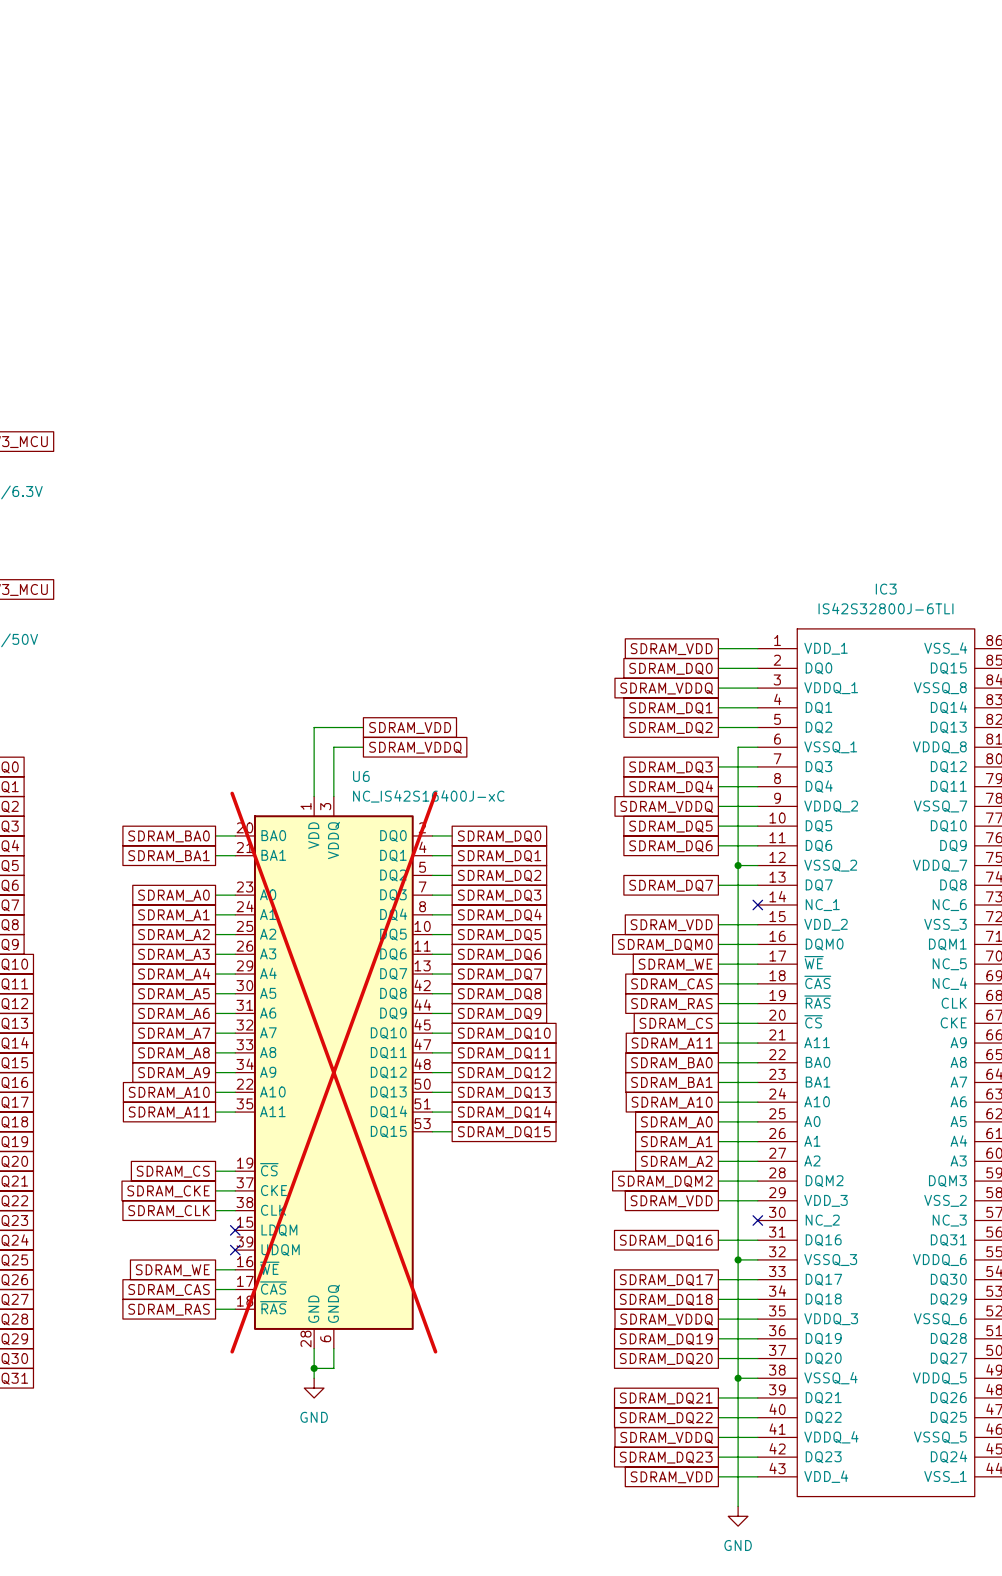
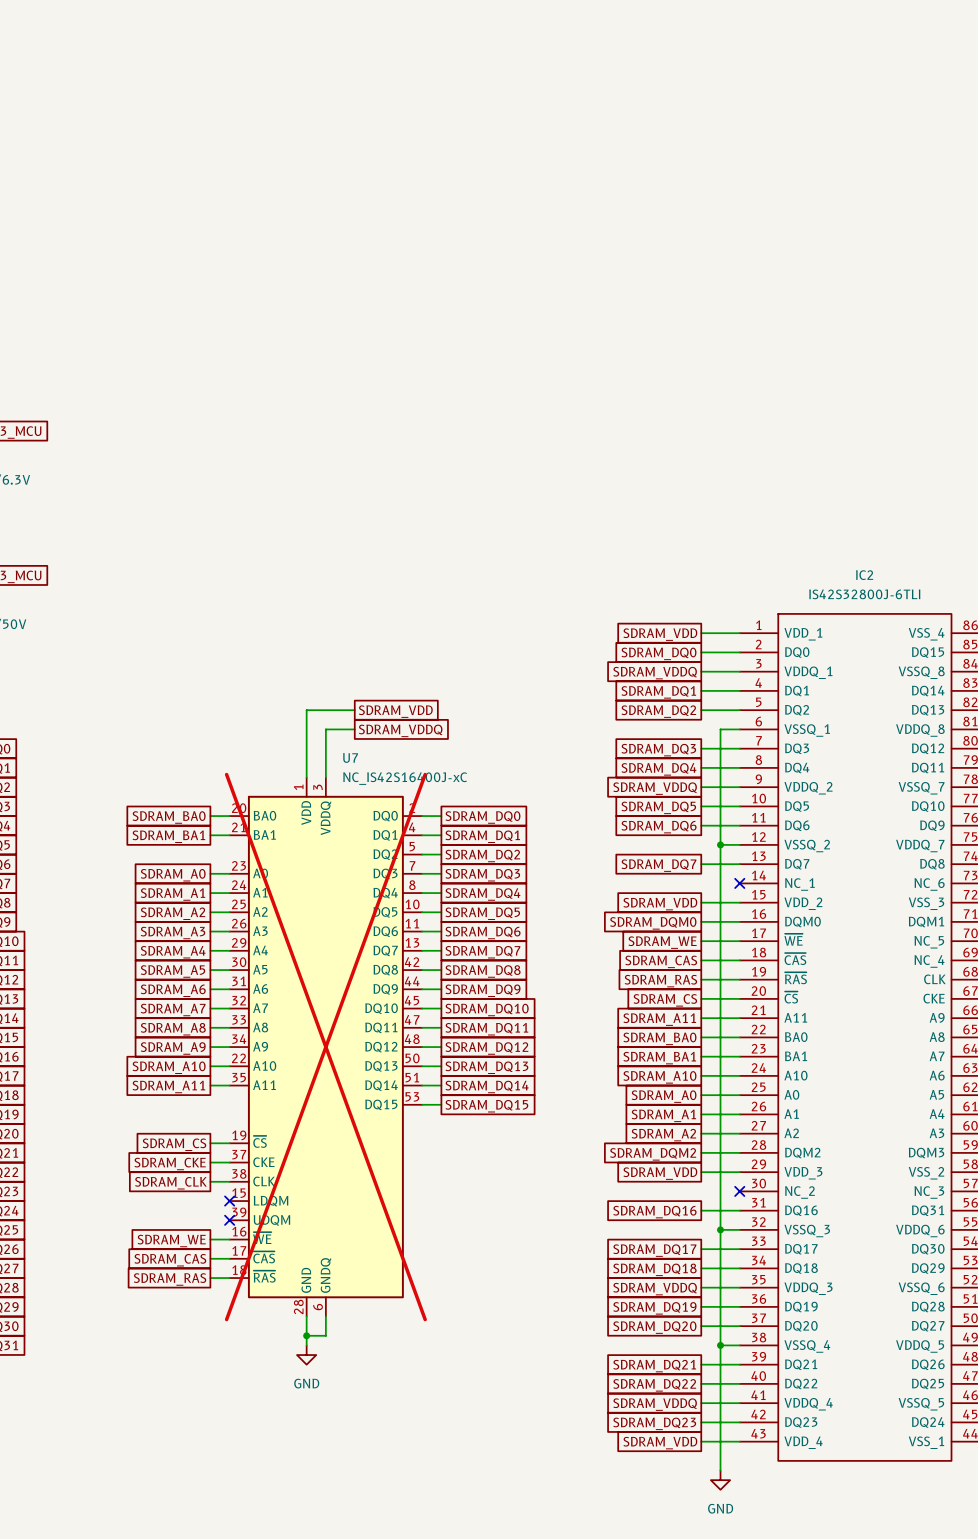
IC3 name: IC3 (886, 589) -> IC2 (864, 575)
U6 name: U6 (361, 776) -> U7 (350, 758)

